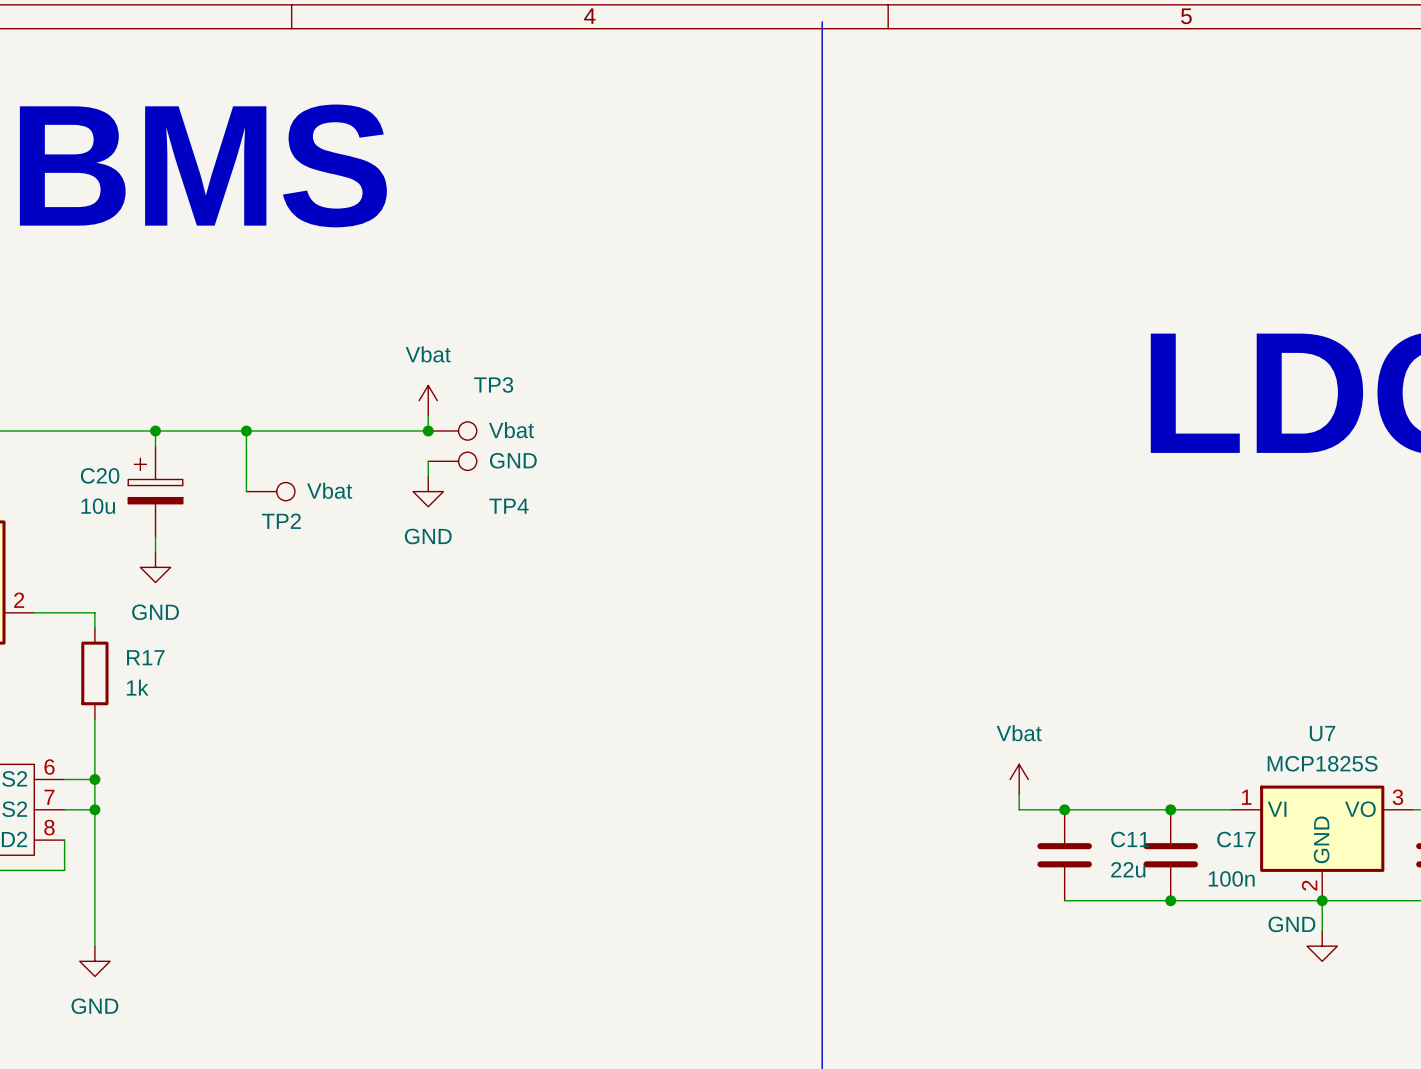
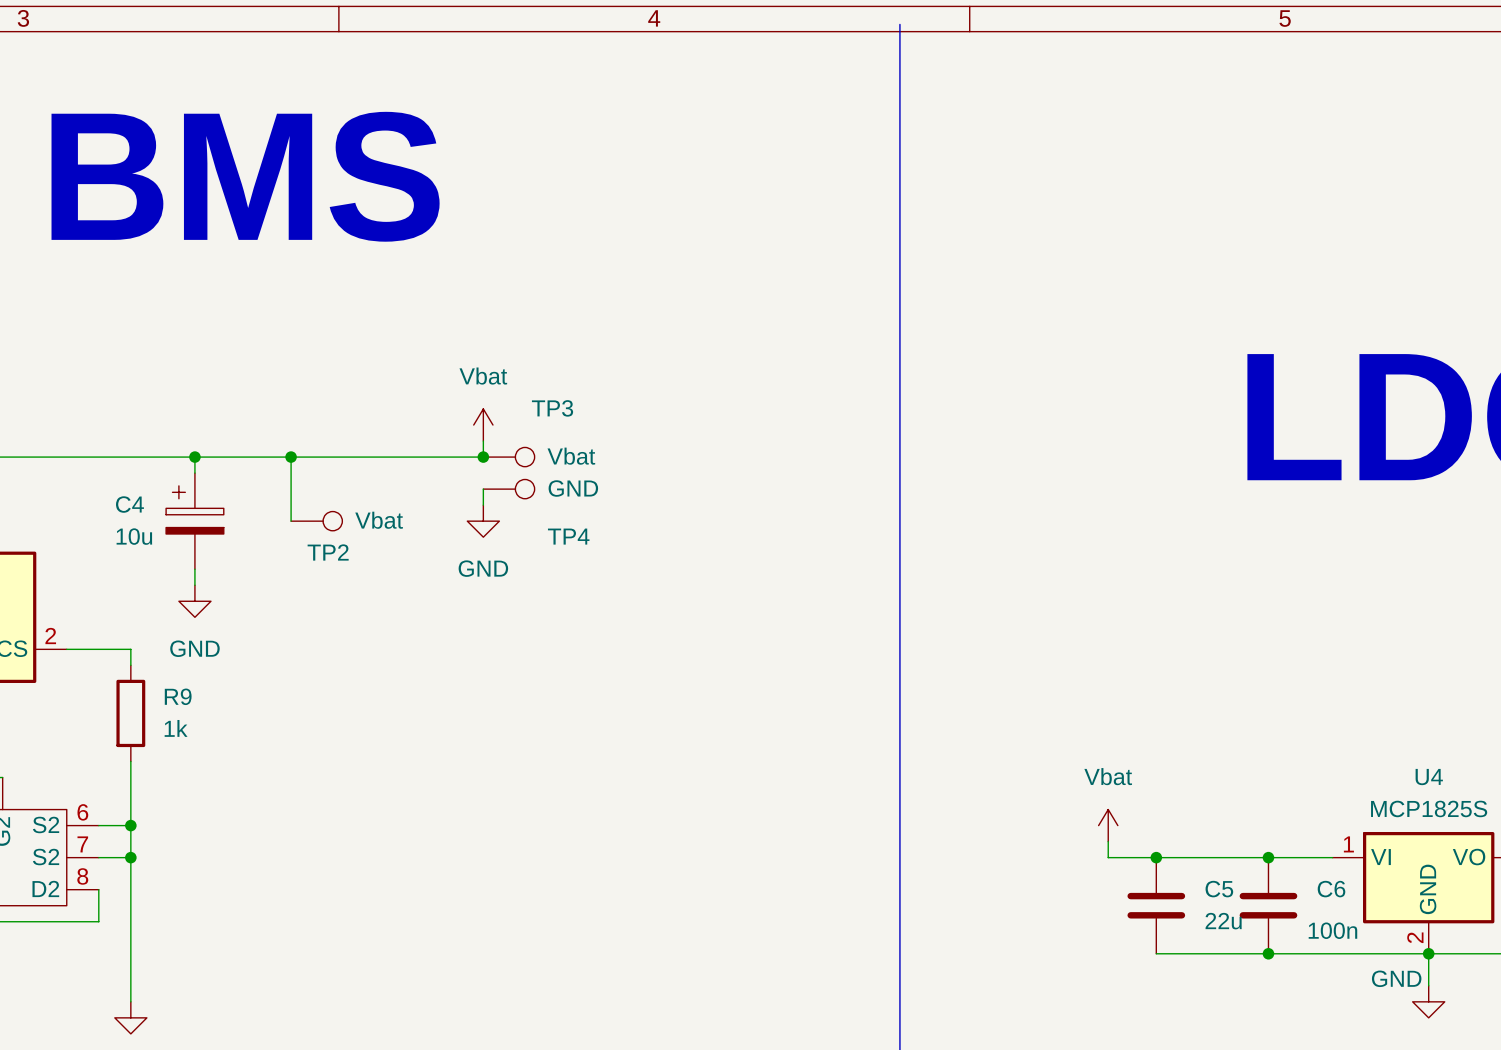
C20 name: C20 (100, 475) -> C4 (129, 504)
R17 name: R17 (145, 657) -> R9 (178, 696)
U7 name: U7 (1322, 733) -> U4 (1429, 777)
C11 name: C11 (1130, 839) -> C5 (1219, 889)
C17 name: C17 (1236, 839) -> C6 (1331, 889)

